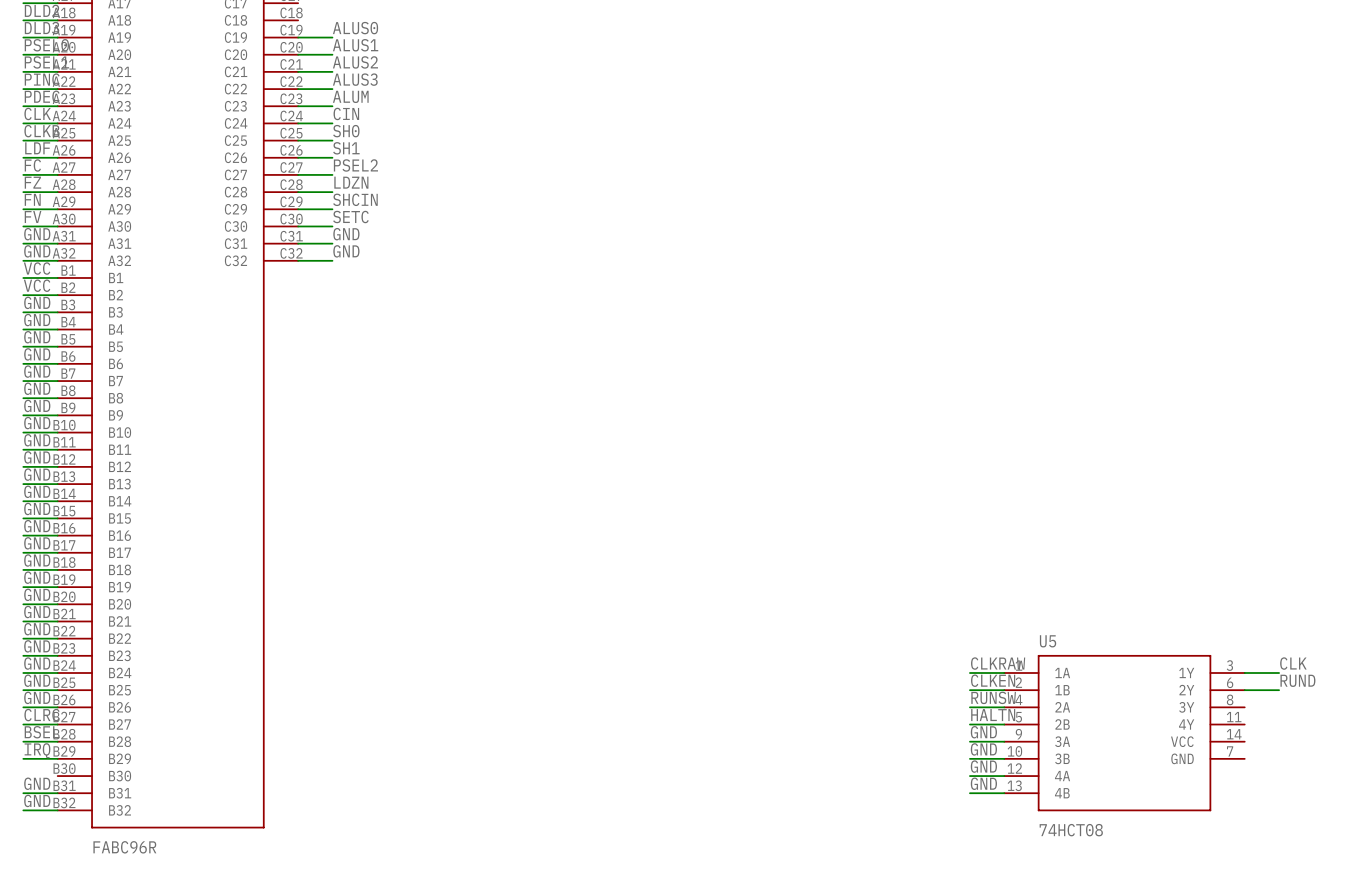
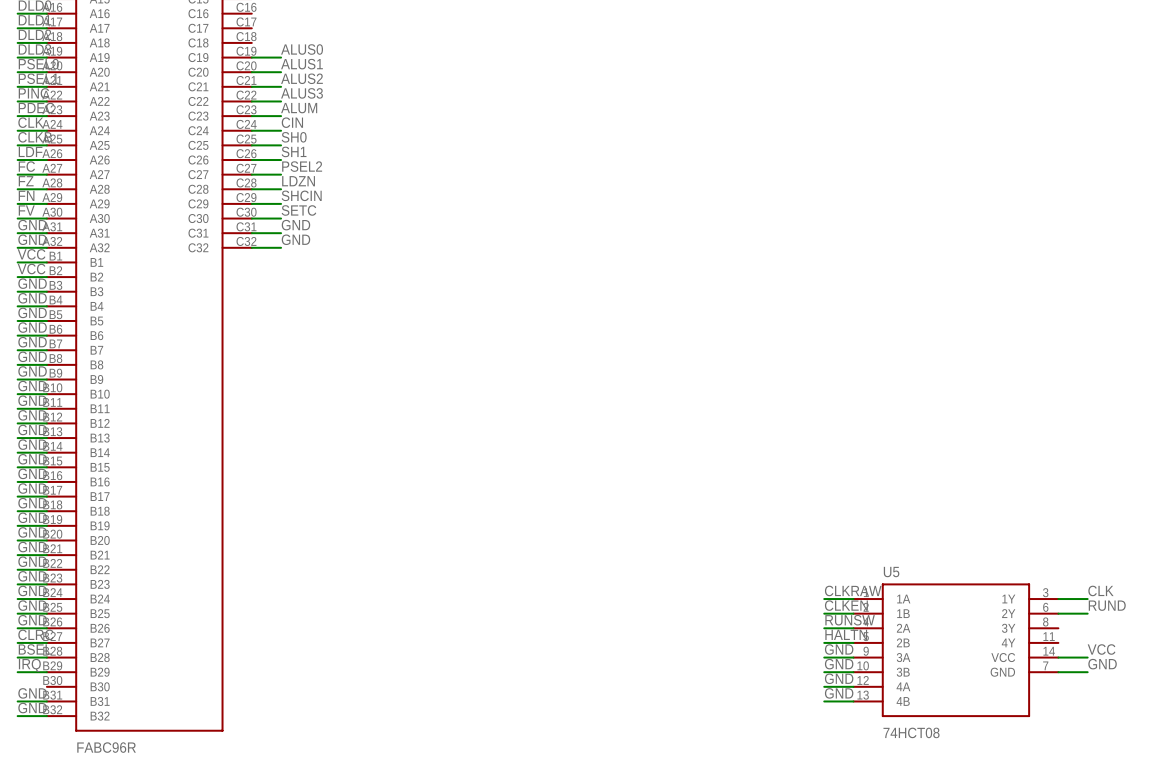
label: none -> VCC (1101, 649)
wire: none -> (1058, 657) (1087, 657)
label: none -> GND (1102, 664)
wire: none -> (1058, 672) (1087, 672)

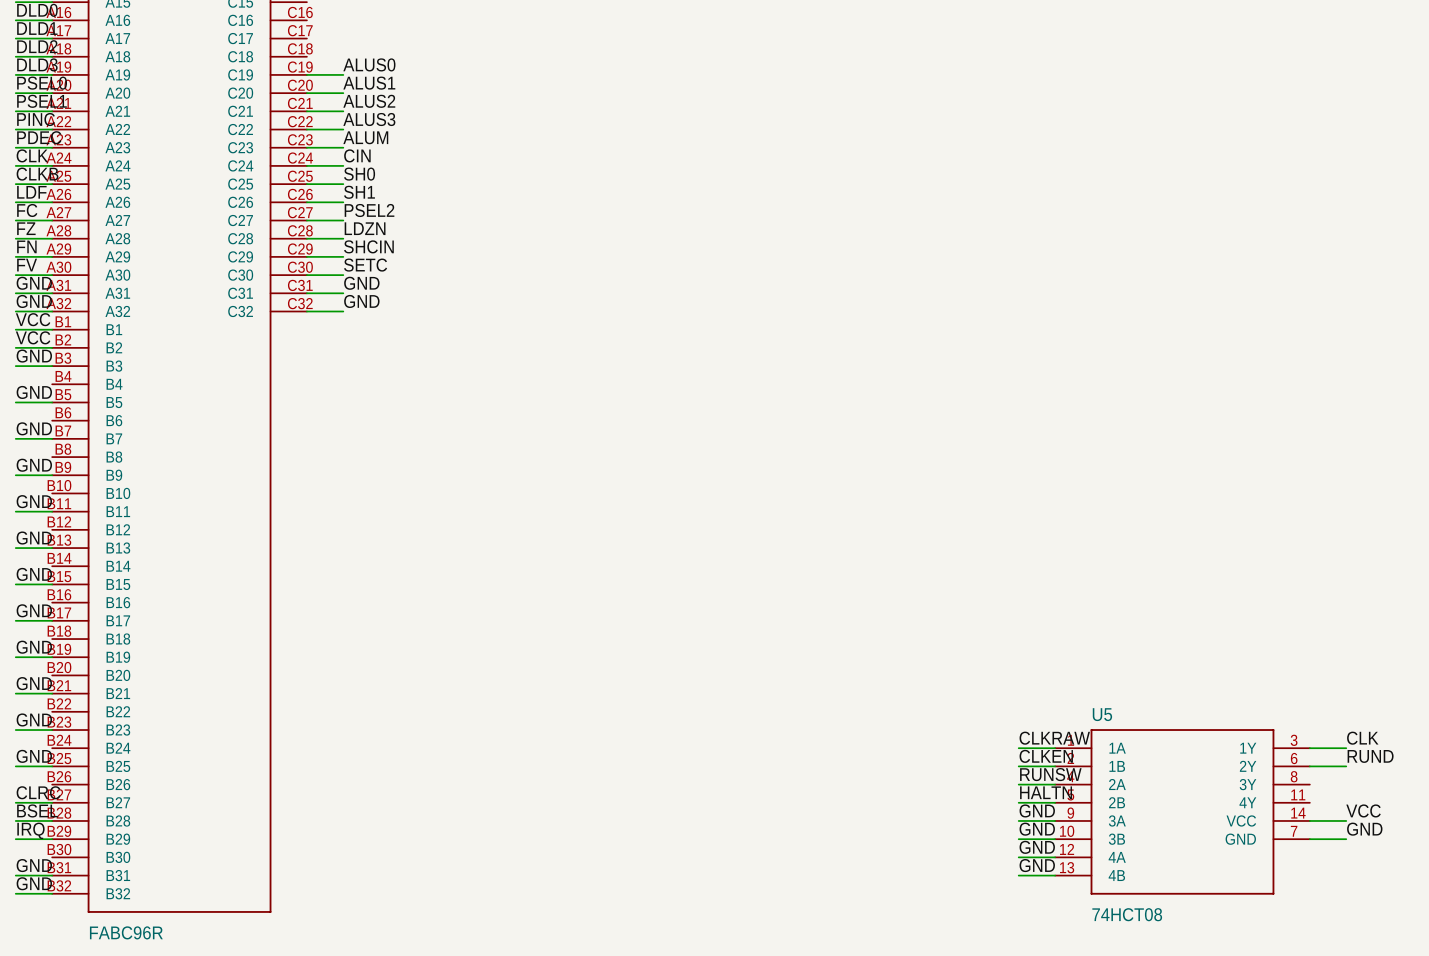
label: GND (32, 298) -> none
wire: (17, 306) (46, 306) -> none
label: GND (32, 327) -> none
wire: (17, 335) (46, 335) -> none
label: GND (32, 356) -> none
wire: (17, 364) (46, 364) -> none
label: GND (32, 386) -> none
wire: (17, 394) (46, 394) -> none
label: GND (32, 415) -> none
wire: (17, 423) (46, 423) -> none
label: GND (32, 444) -> none
wire: (17, 452) (46, 452) -> none
label: GND (32, 473) -> none
wire: (17, 481) (46, 481) -> none
label: GND (32, 503) -> none
wire: (17, 511) (46, 511) -> none
label: GND (32, 532) -> none
wire: (17, 540) (46, 540) -> none
label: GND (32, 561) -> none
wire: (17, 569) (46, 569) -> none
label: GND (32, 590) -> none
wire: (17, 599) (46, 599) -> none
label: GND (32, 620) -> none
wire: (17, 628) (46, 628) -> none

